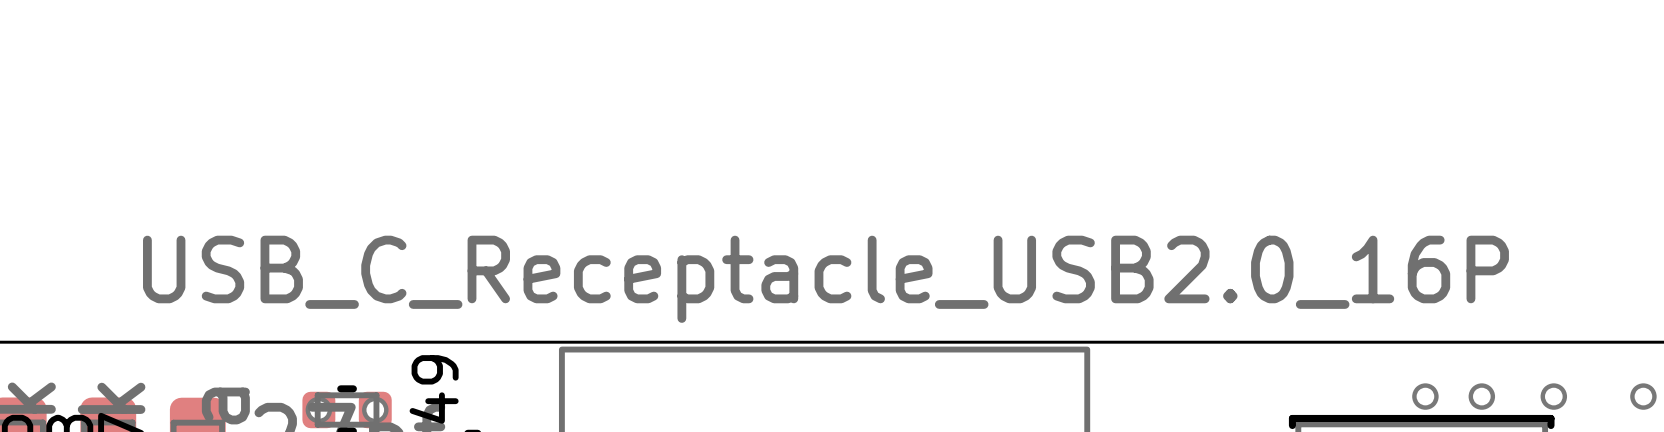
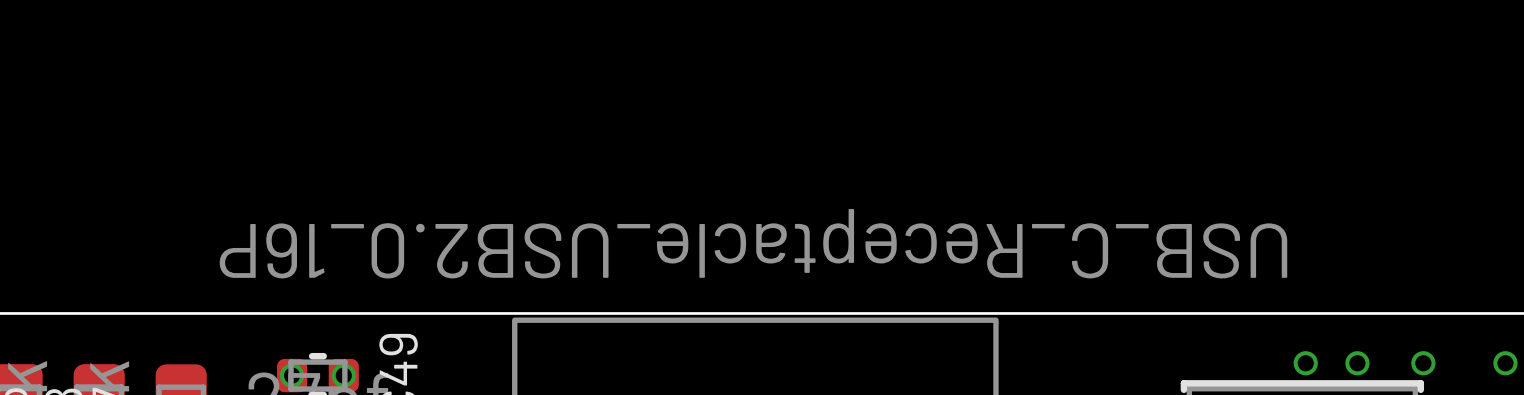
part value rotation: 0° (825, 279) -> 180° (753, 243)

